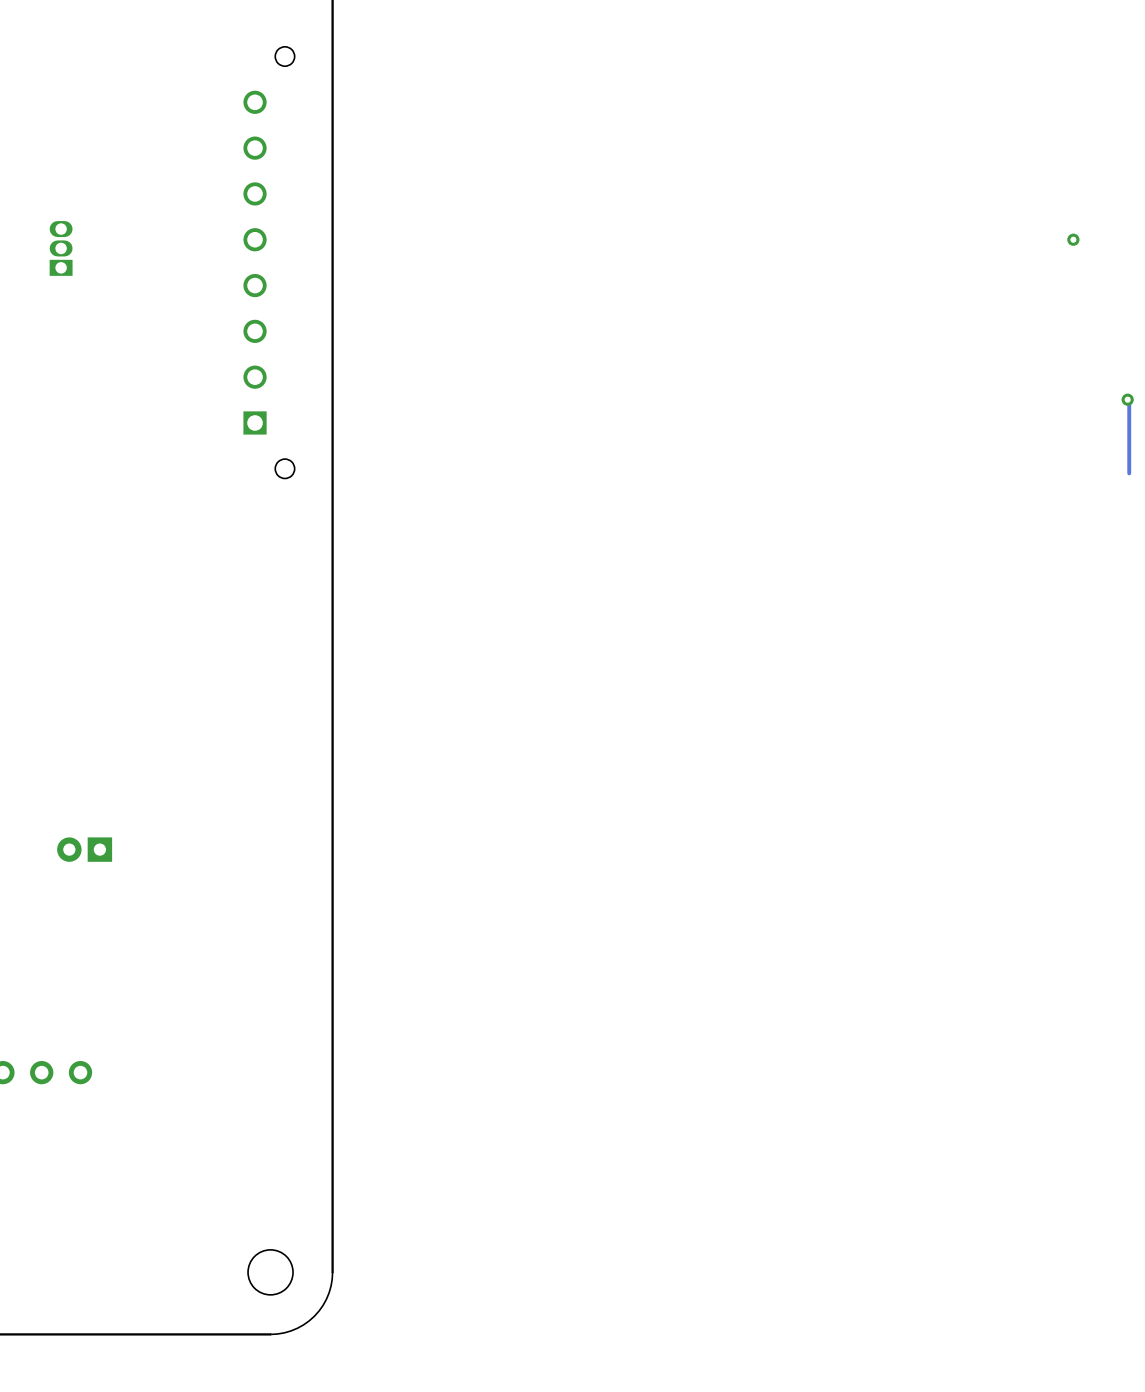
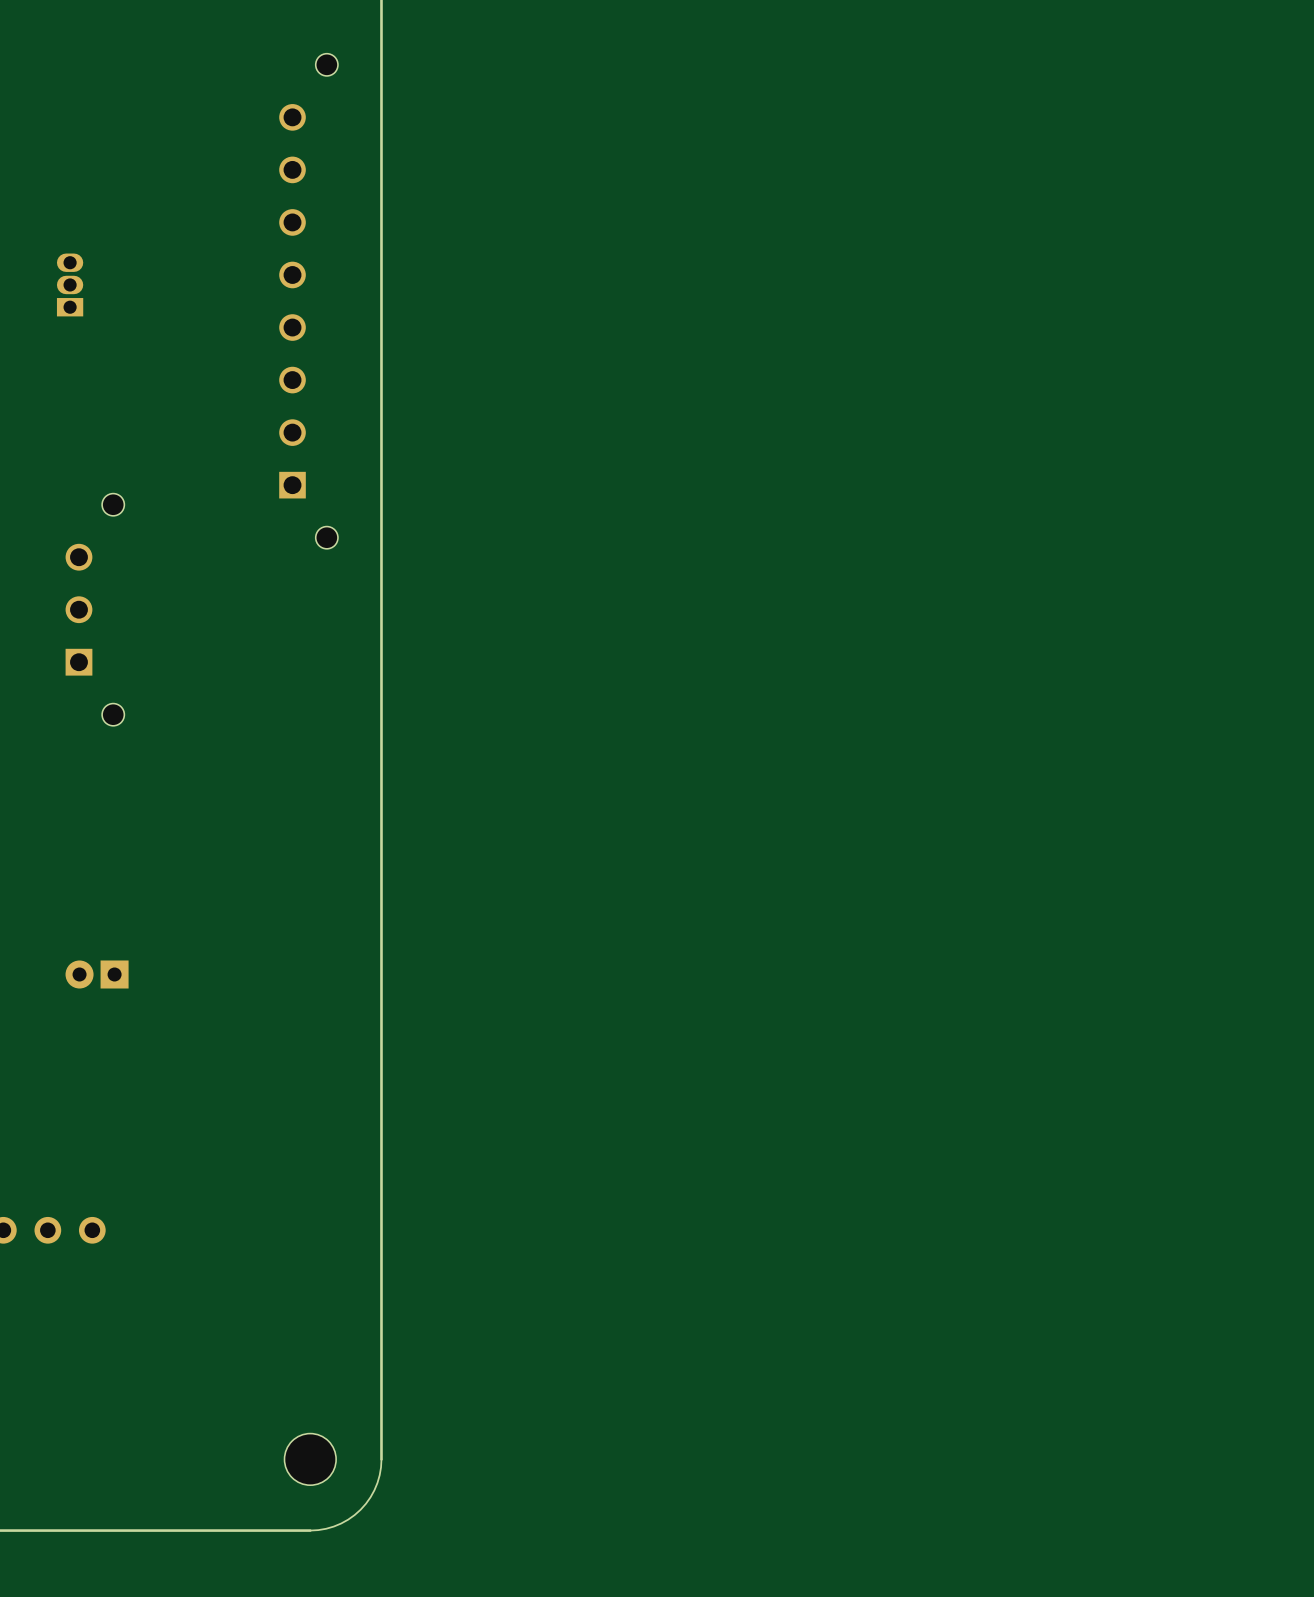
via: (1073, 239) -> none
track: (1127, 399) (1129, 401) (1129, 473) -> none
via: (1127, 399) -> none
part: none -> (94, 609)

